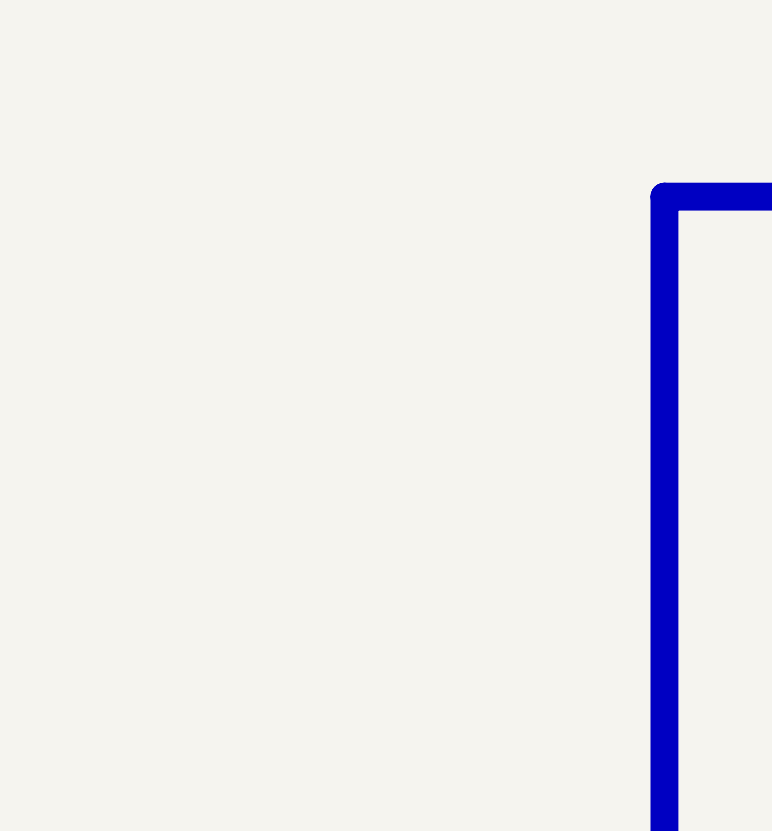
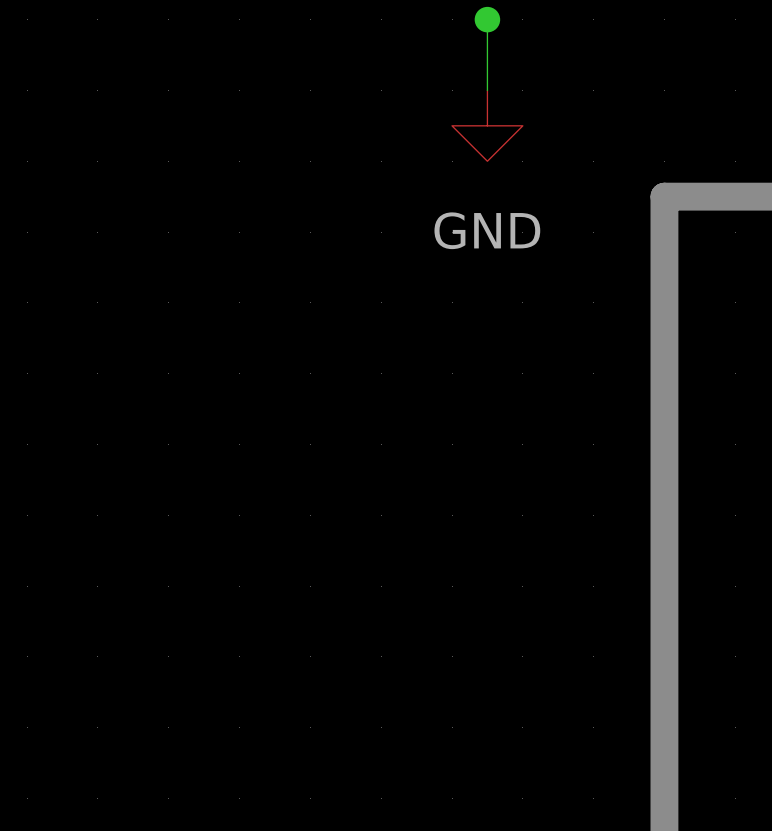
wire: none -> (487, 19) (487, 90)
junction: none -> (487, 19)
power symbol: none -> GND (487, 125)

